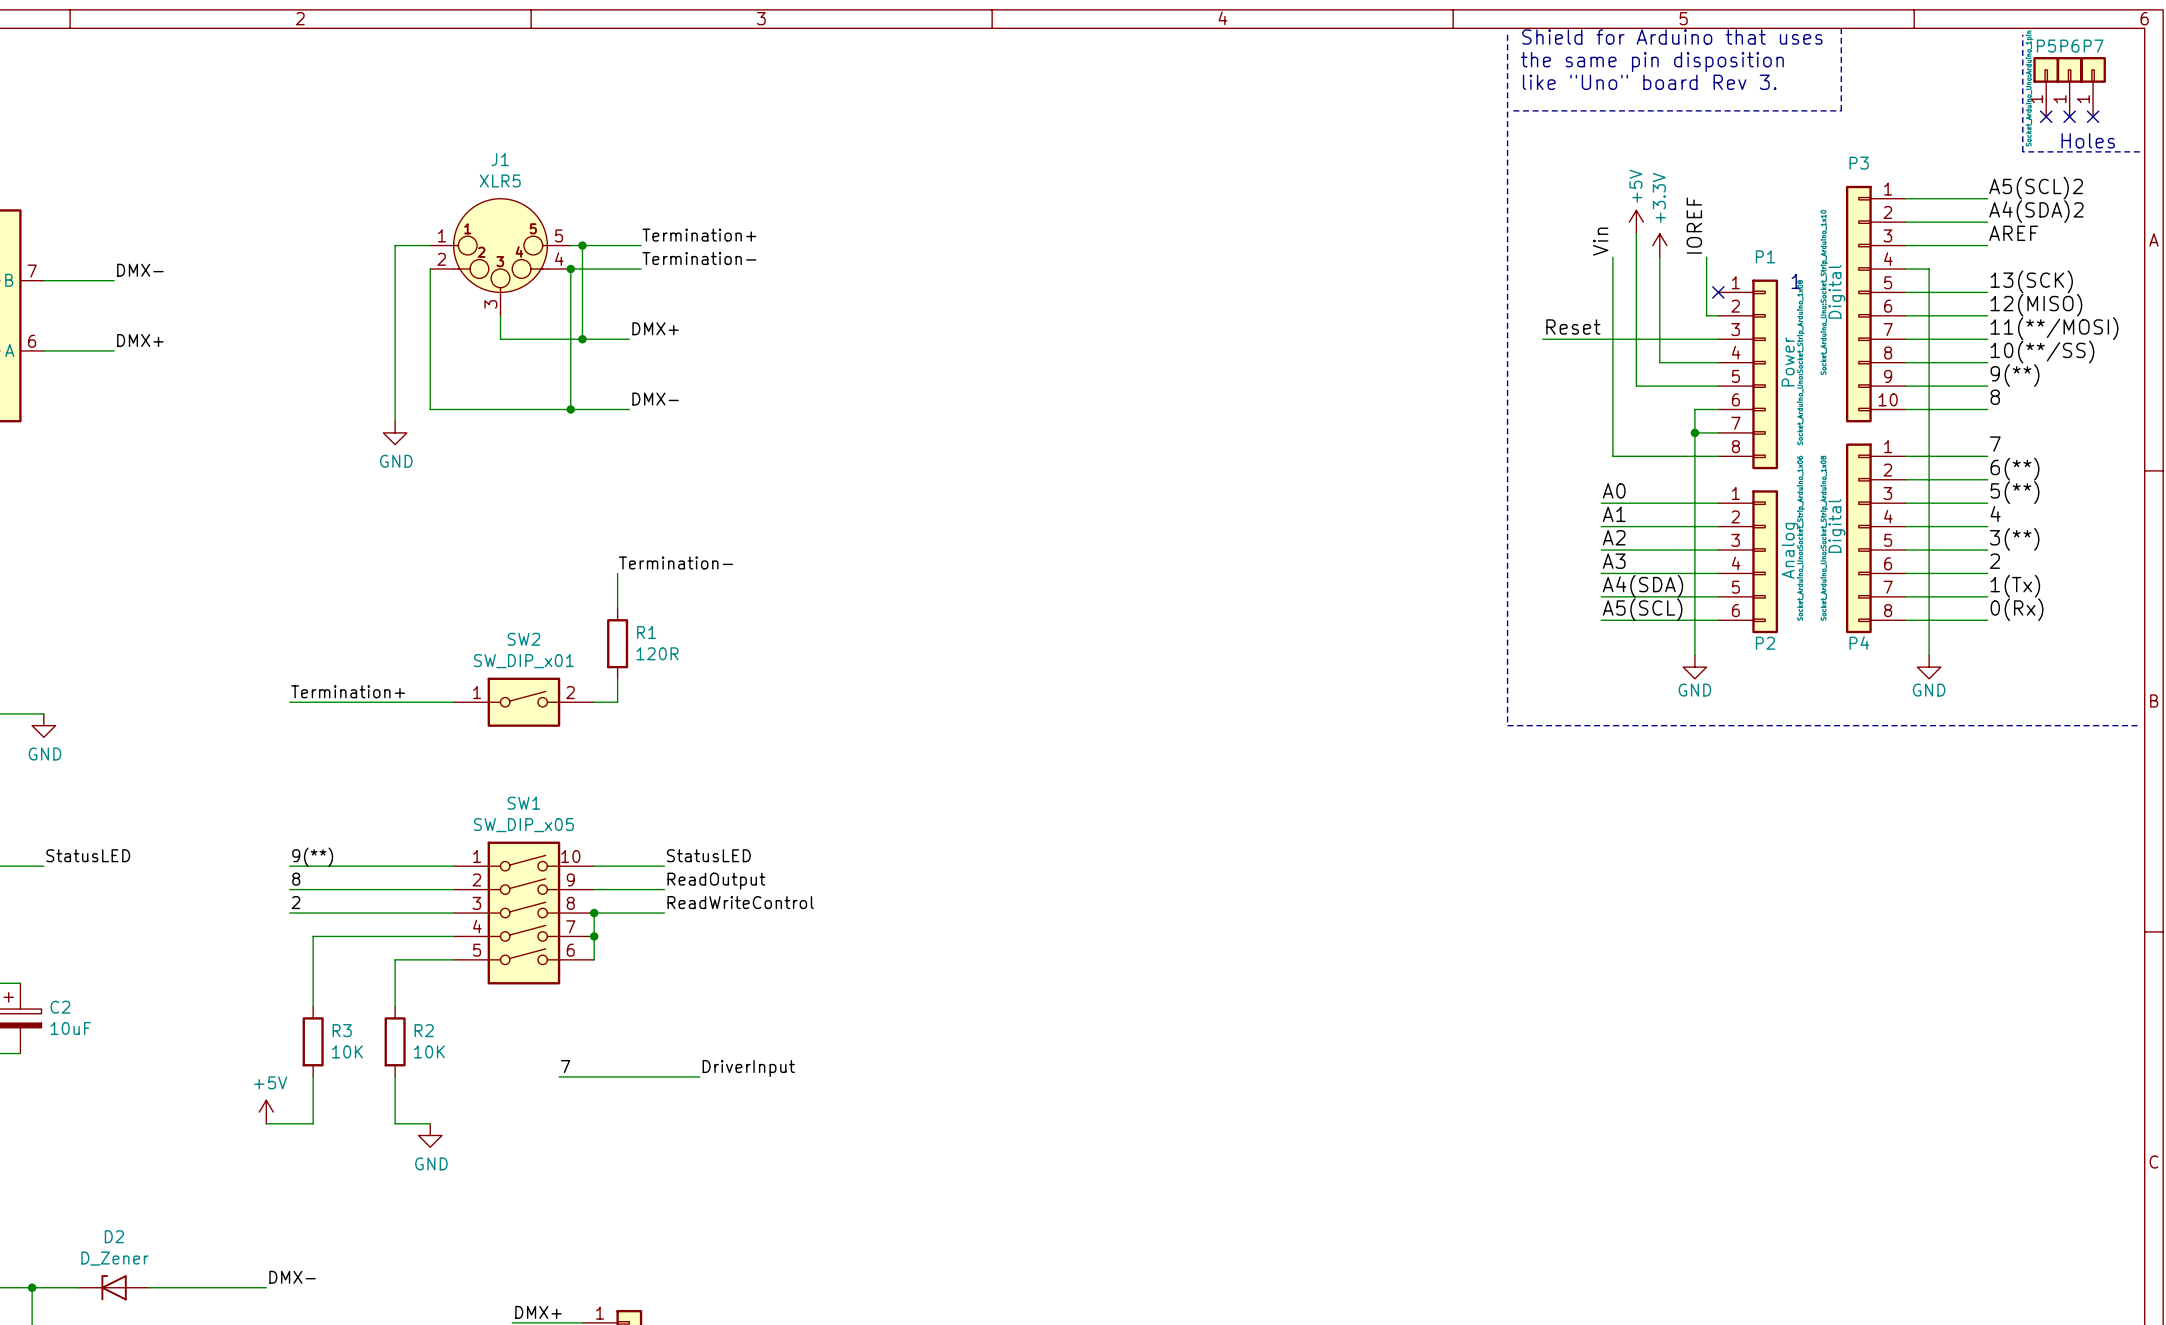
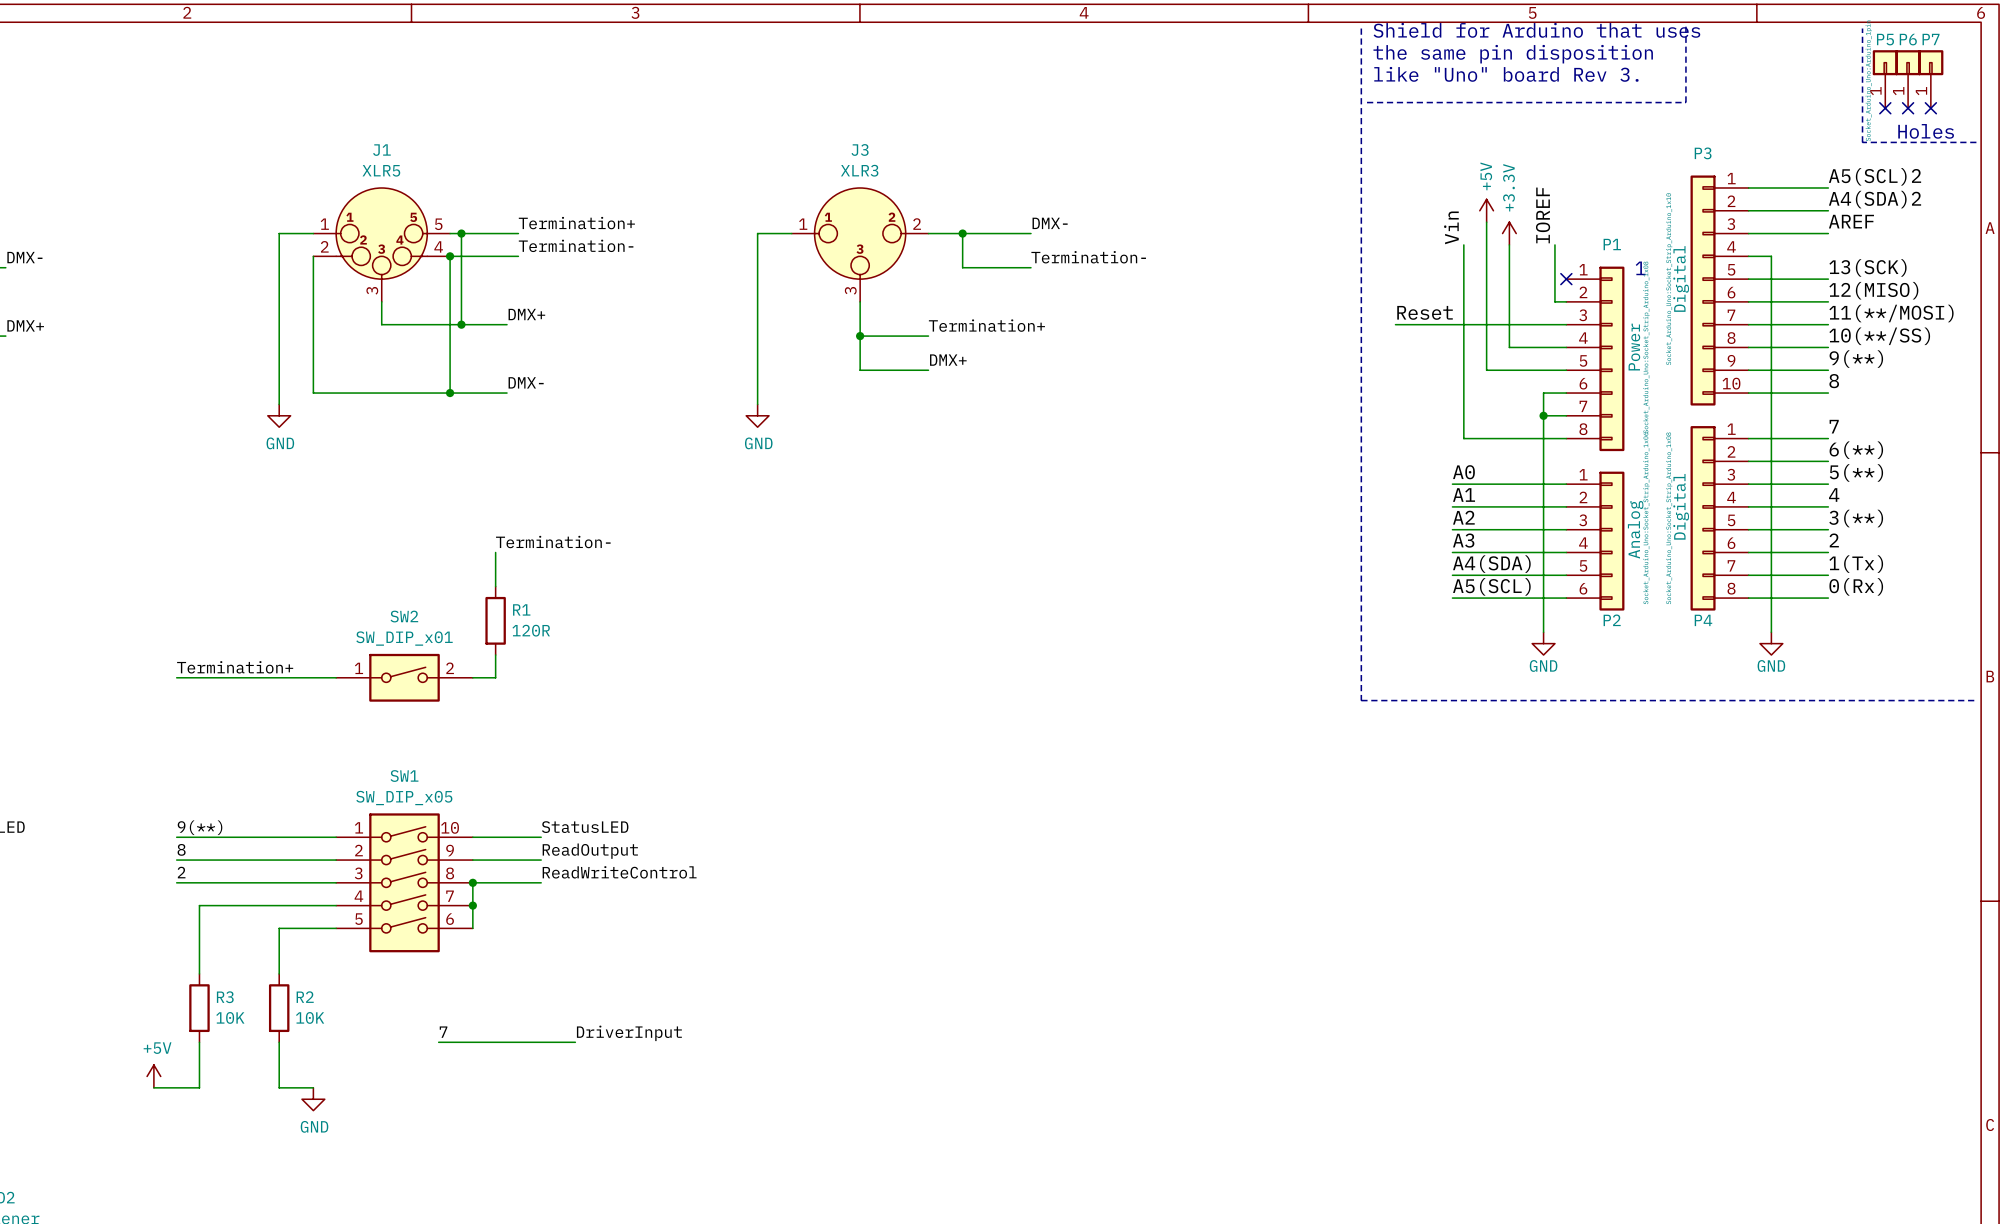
label: none -> DMX- (1050, 223)
wire: none -> (791, 233) (757, 233) (757, 404)
wire: none -> (928, 233) (1030, 233)
wire: none -> (962, 233) (962, 267) (1030, 267)
junction: none -> (962, 233)
J3: none -> XLR3 (860, 244)
label: none -> Termination- (1088, 257)
wire: none -> (860, 301) (860, 370) (928, 370)
label: none -> Termination+ (986, 325)
wire: none -> (860, 336) (928, 336)
junction: none -> (860, 336)
label: none -> DMX+ (948, 360)
power symbol: none -> GND (757, 415)

